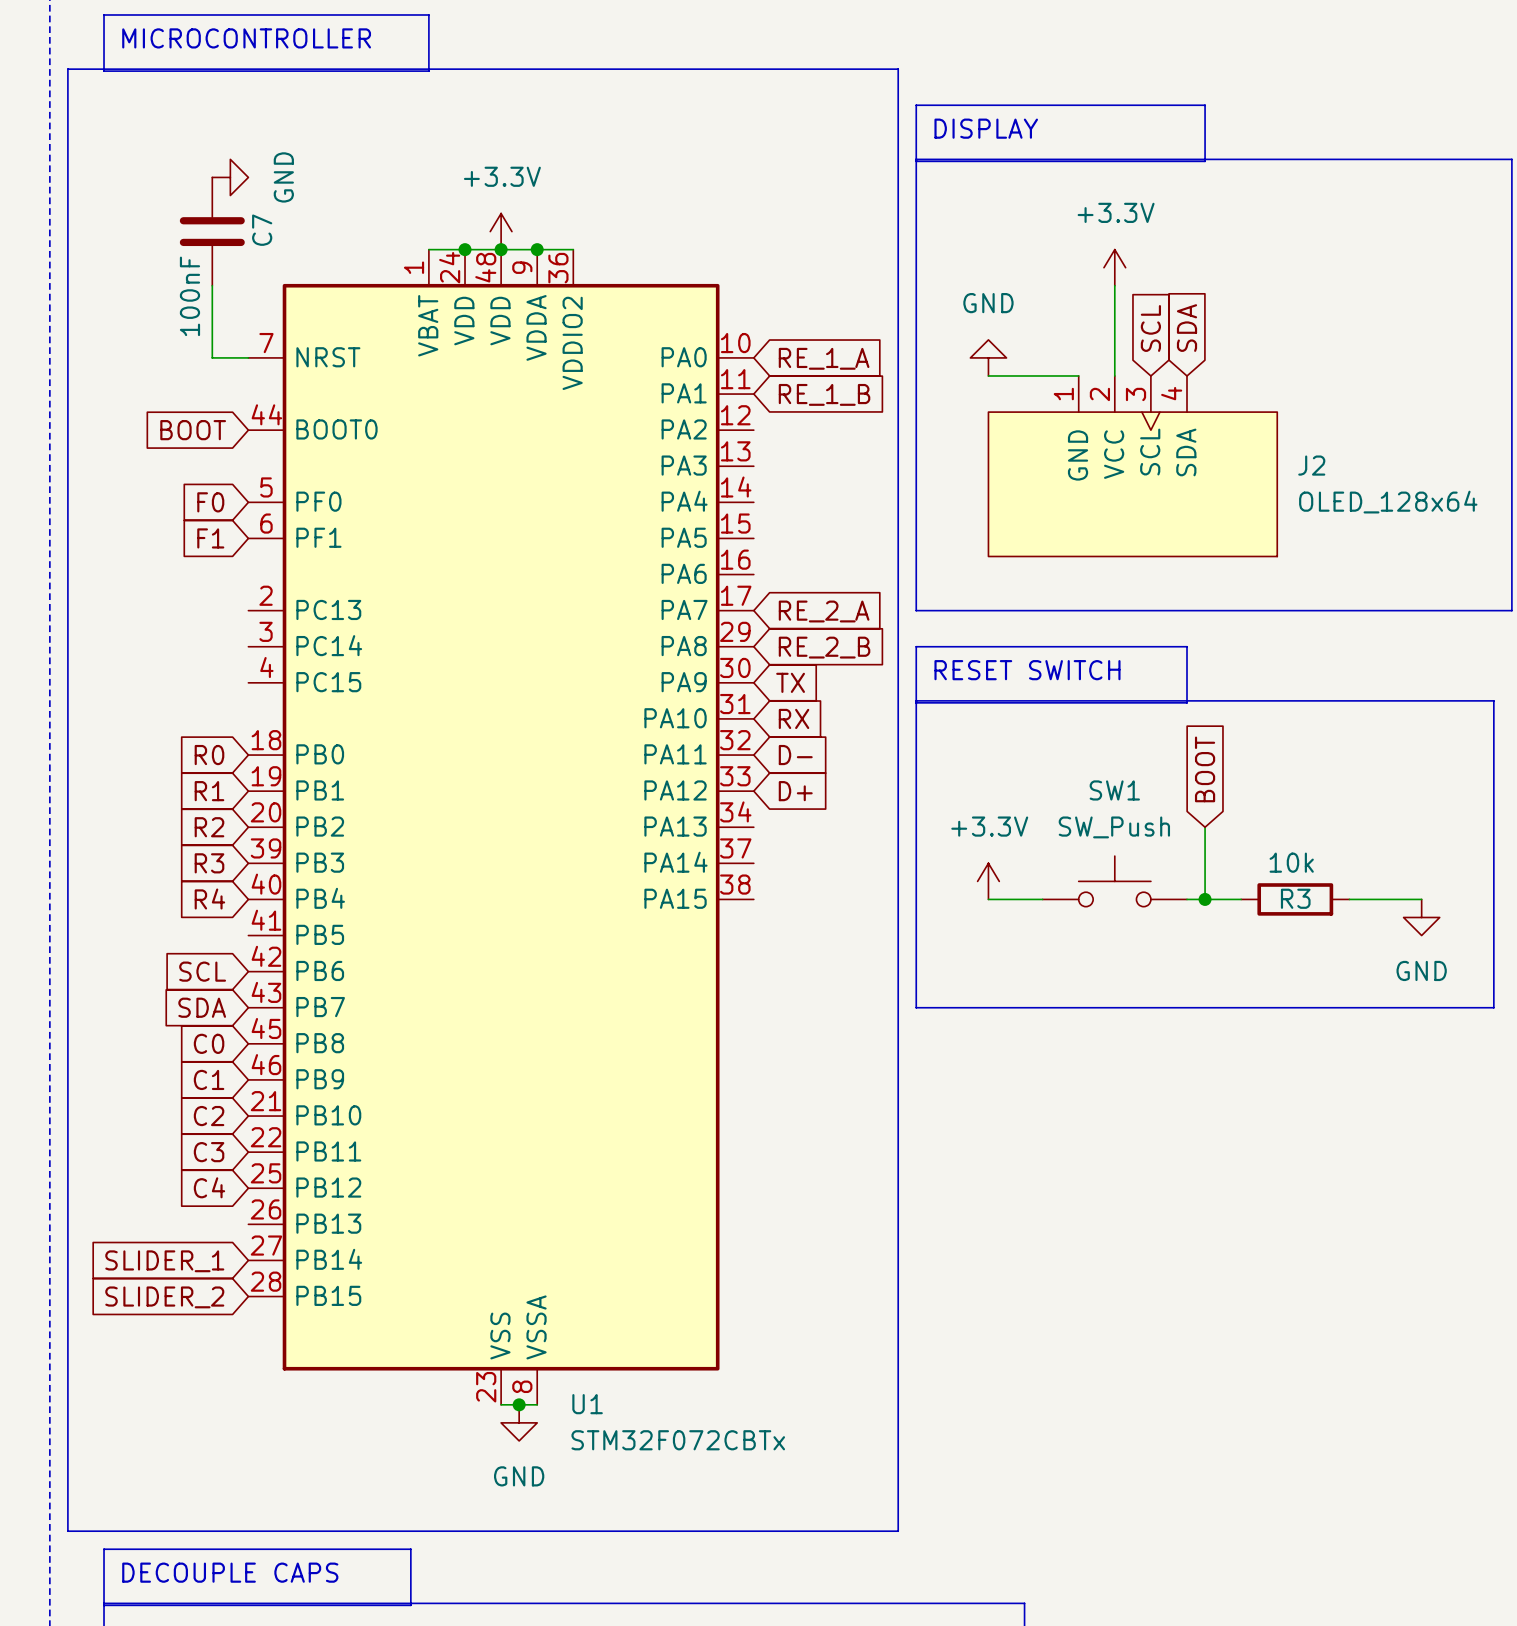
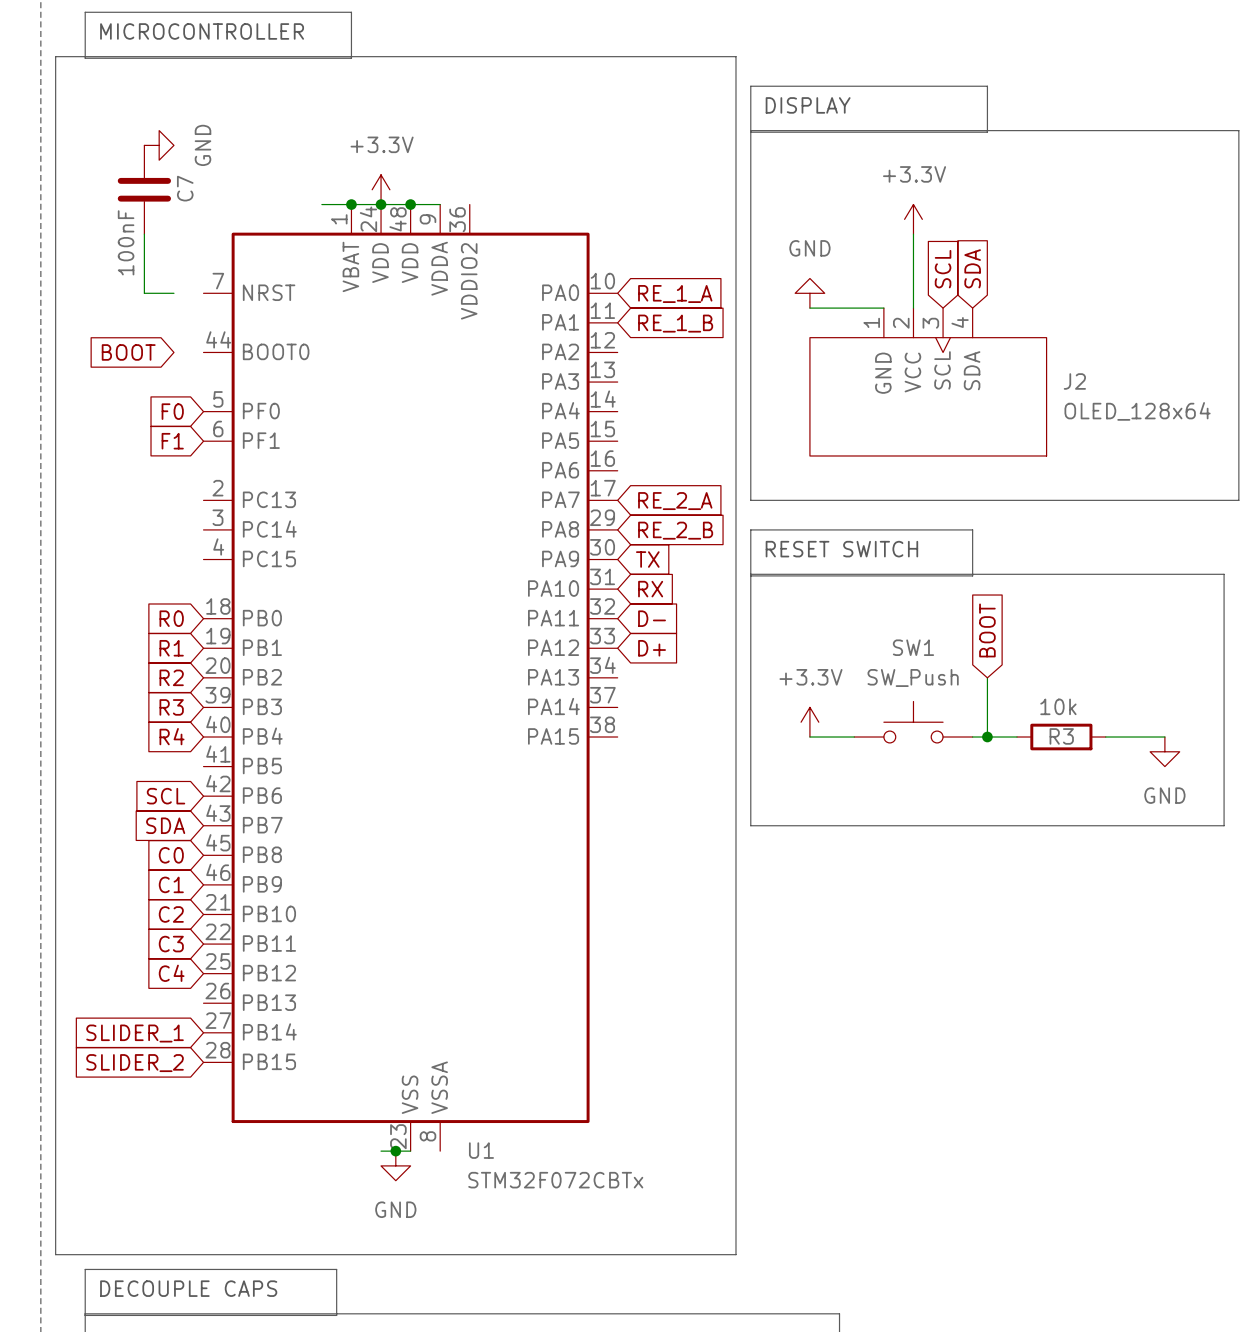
power symbol position: GND (230, 177) -> GND (159, 145)
C7 position: (212, 231) -> (144, 189)
power symbol position: +3.3V (501, 231) -> +3.3V (381, 189)
junction: none -> (351, 204)
wire: (537, 249) (573, 249) -> (321, 204) (351, 204)
junction: (537, 249) -> none
wire: (212, 285) (212, 357) (248, 357) -> (144, 234) (144, 293) (173, 293)
global label position: BOOT (193, 430) -> BOOT (128, 352)
wire: (501, 1404) (537, 1404) -> (410, 1151) (381, 1151)
junction position: (519, 1404) -> (395, 1151)
power symbol position: GND (519, 1422) -> GND (395, 1165)

